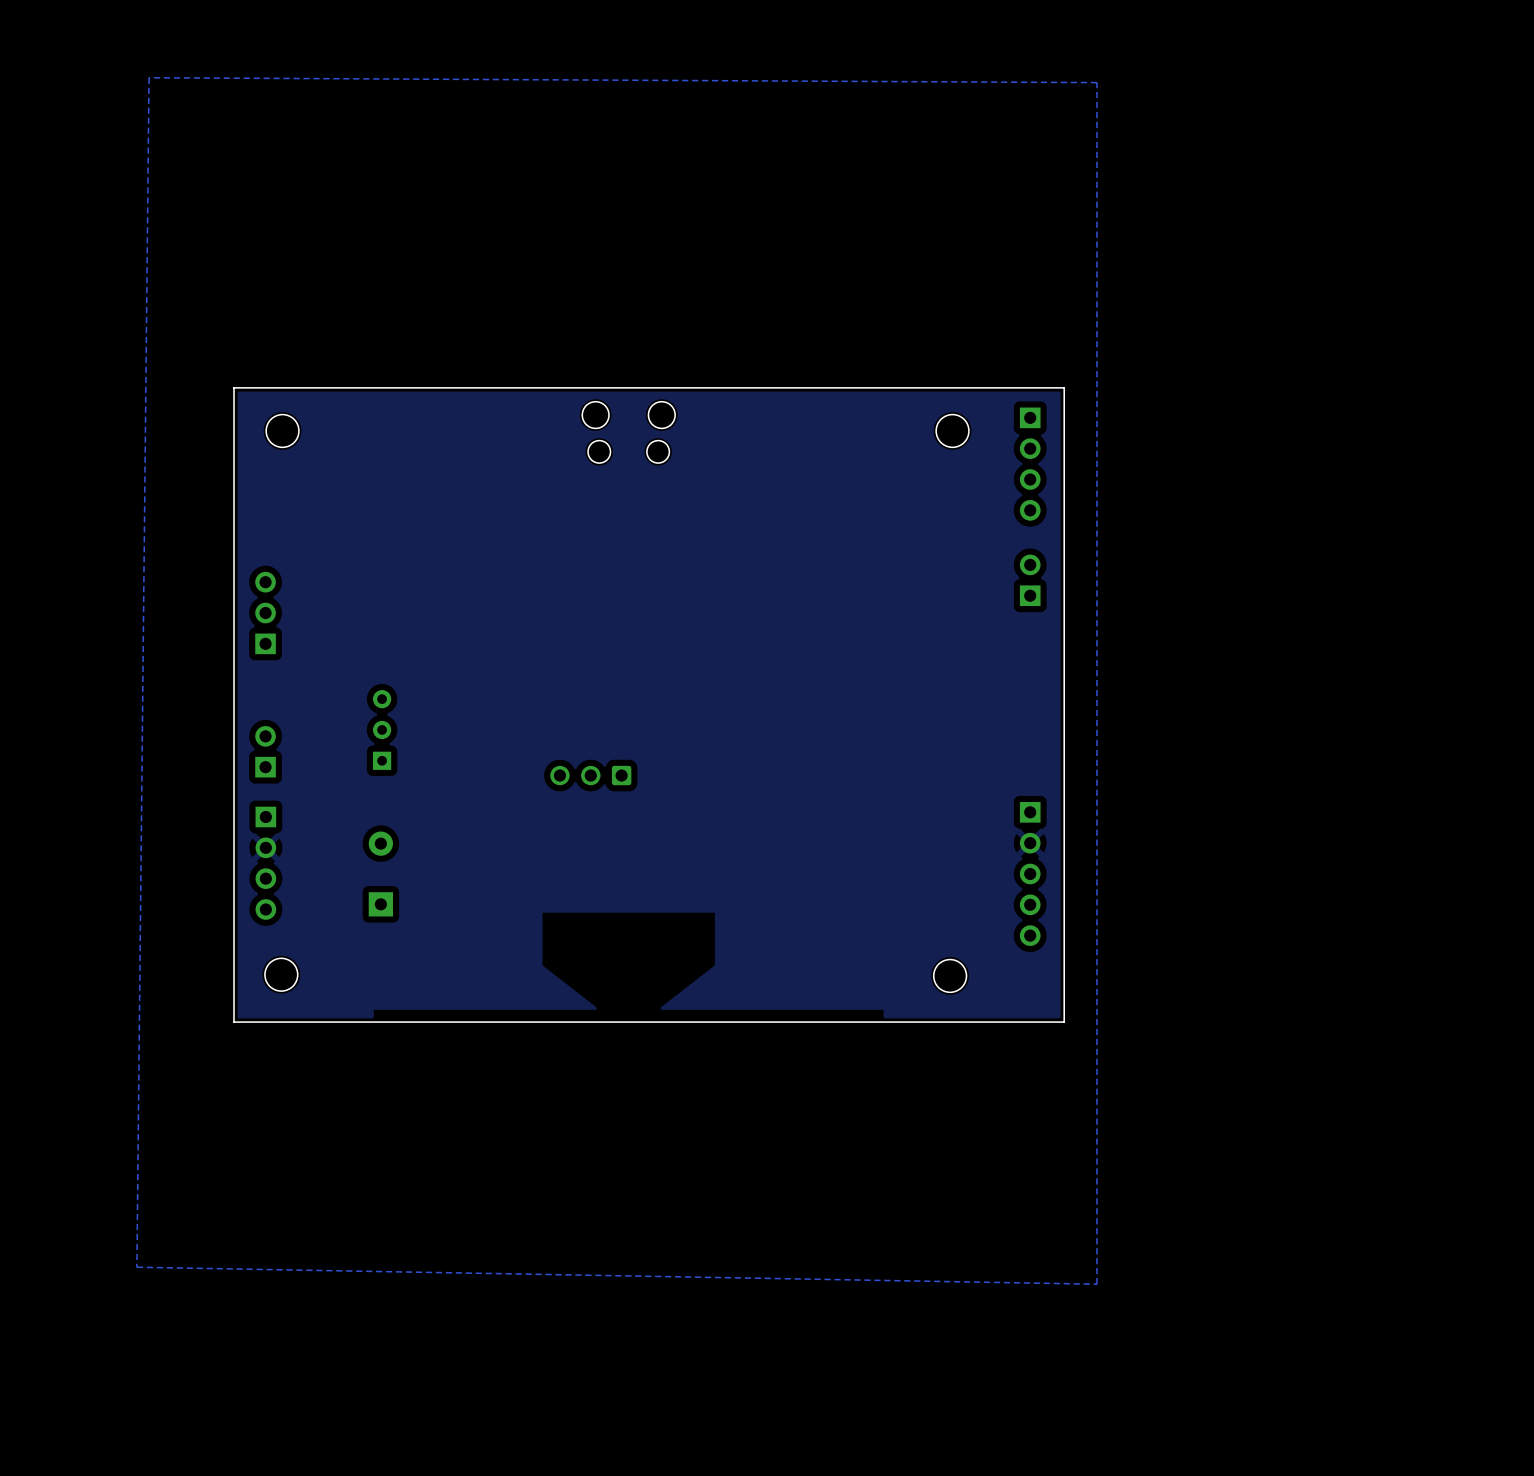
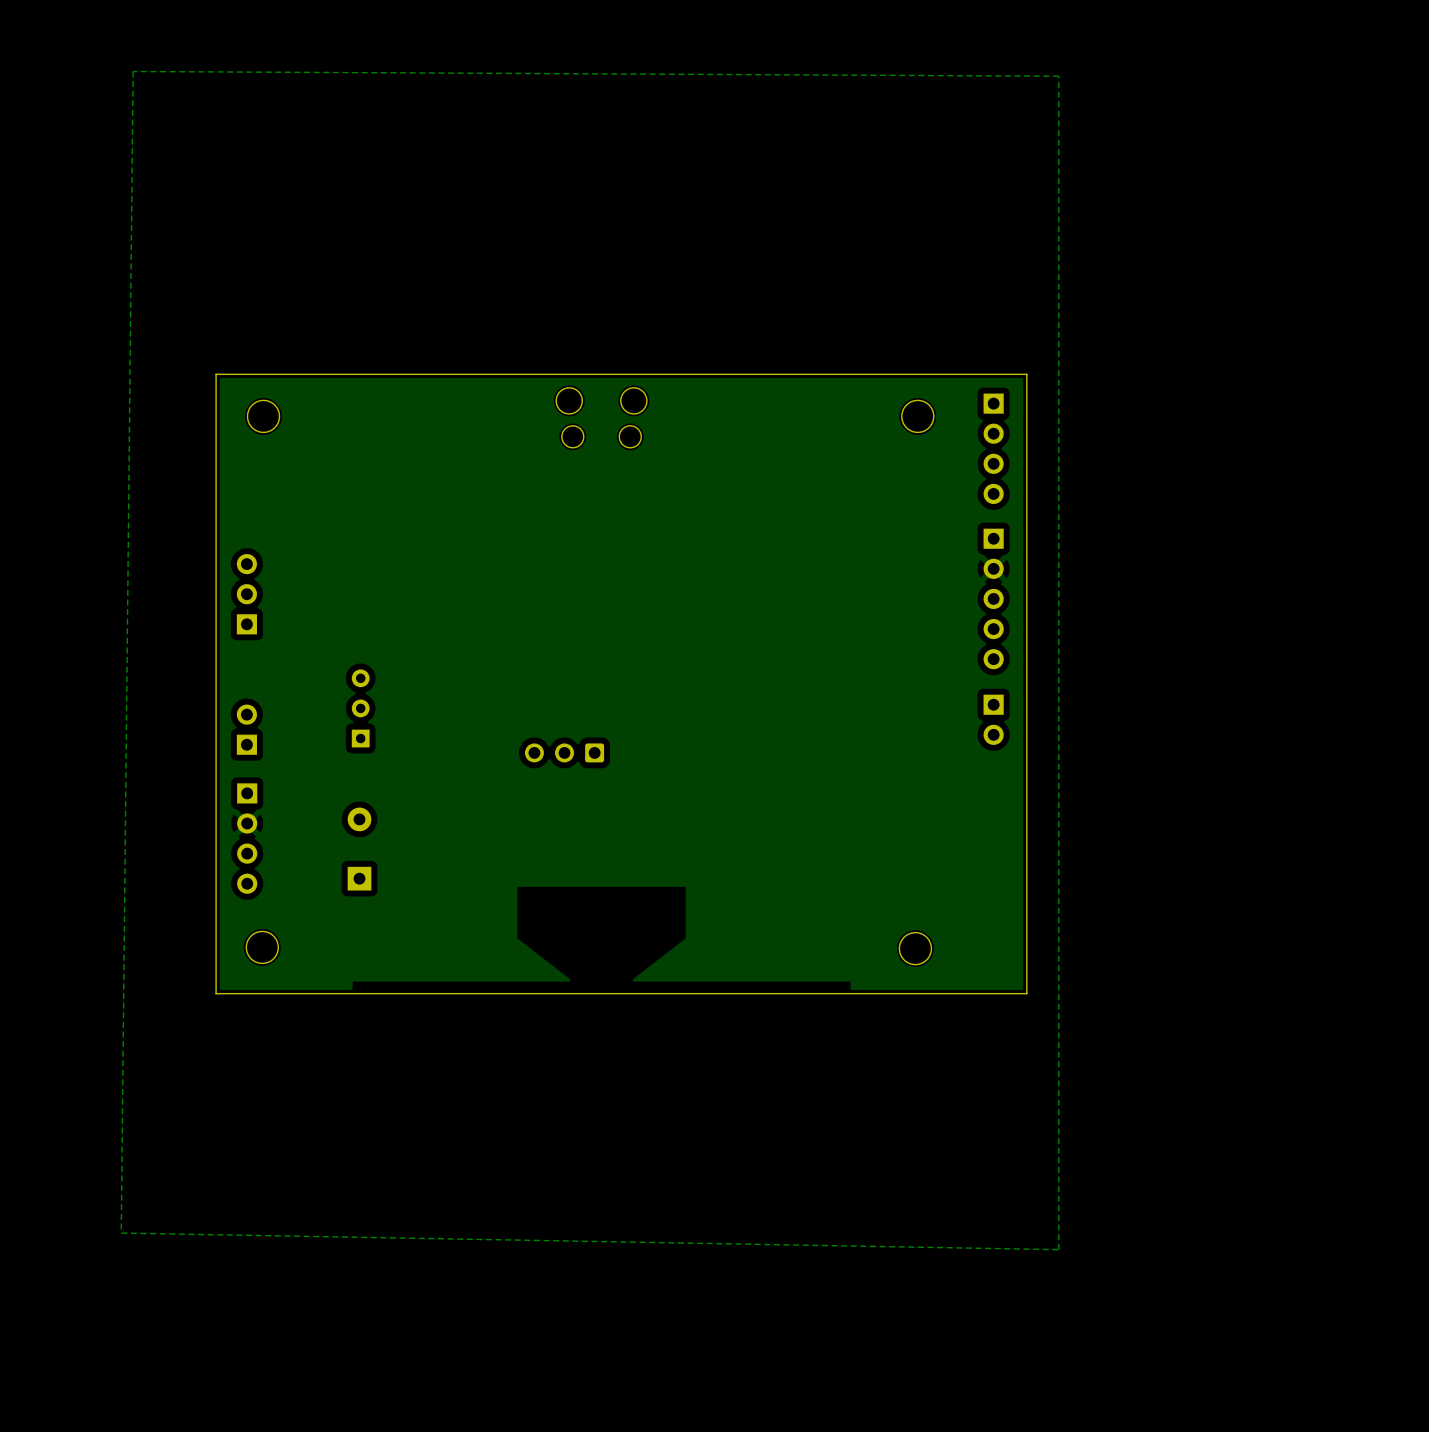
part rotation: 0° (1030, 580) -> 180° (993, 719)
part position: (1030, 580) -> (993, 719)
part position: (1030, 873) -> (993, 598)

